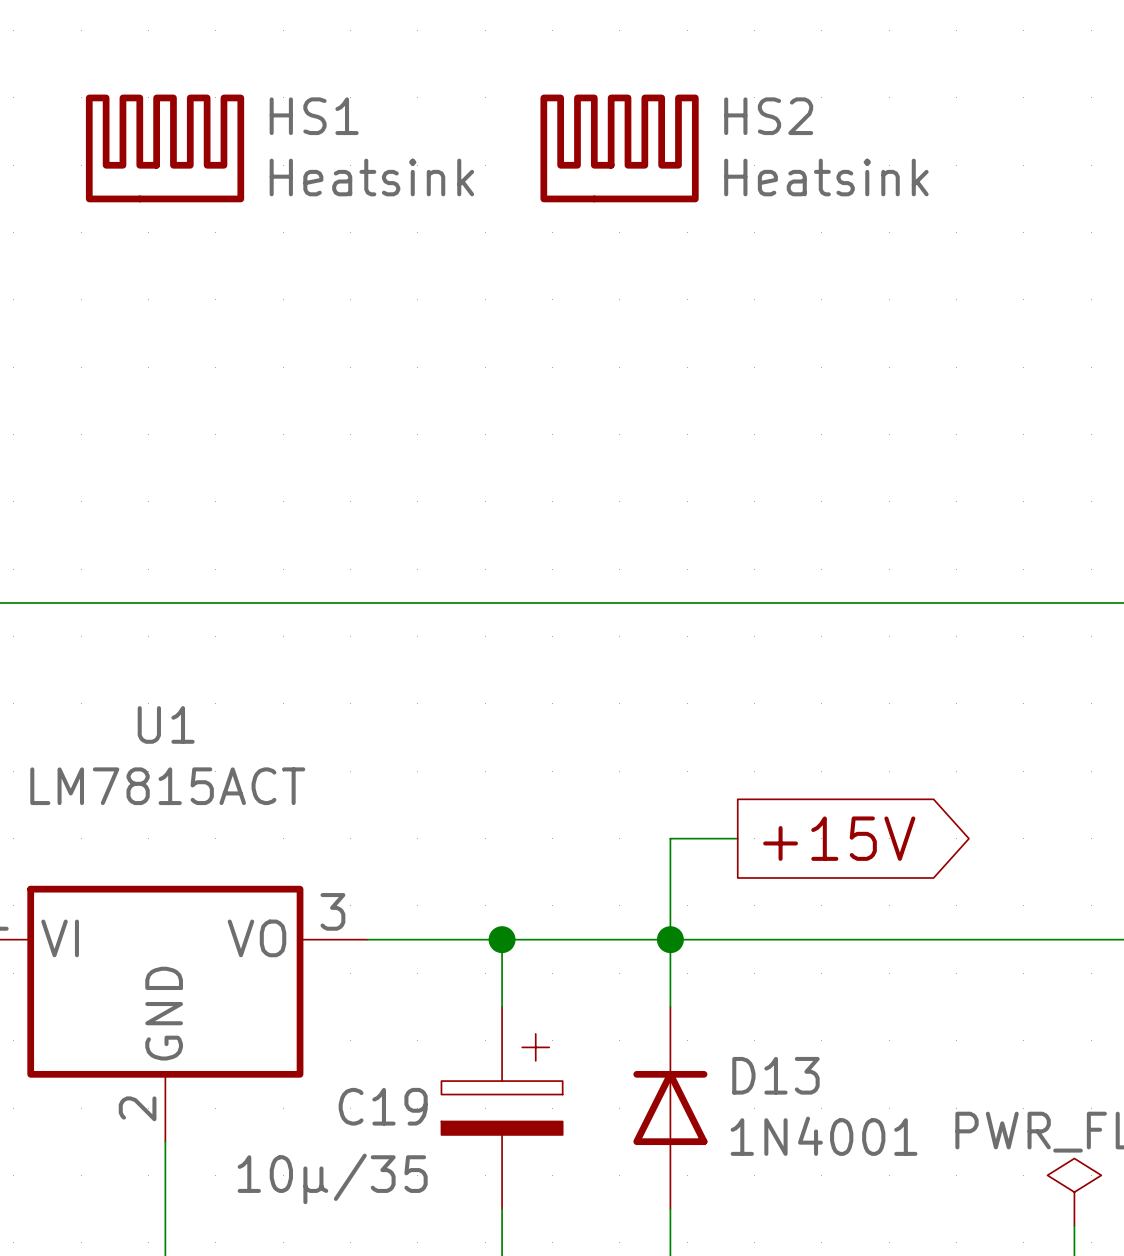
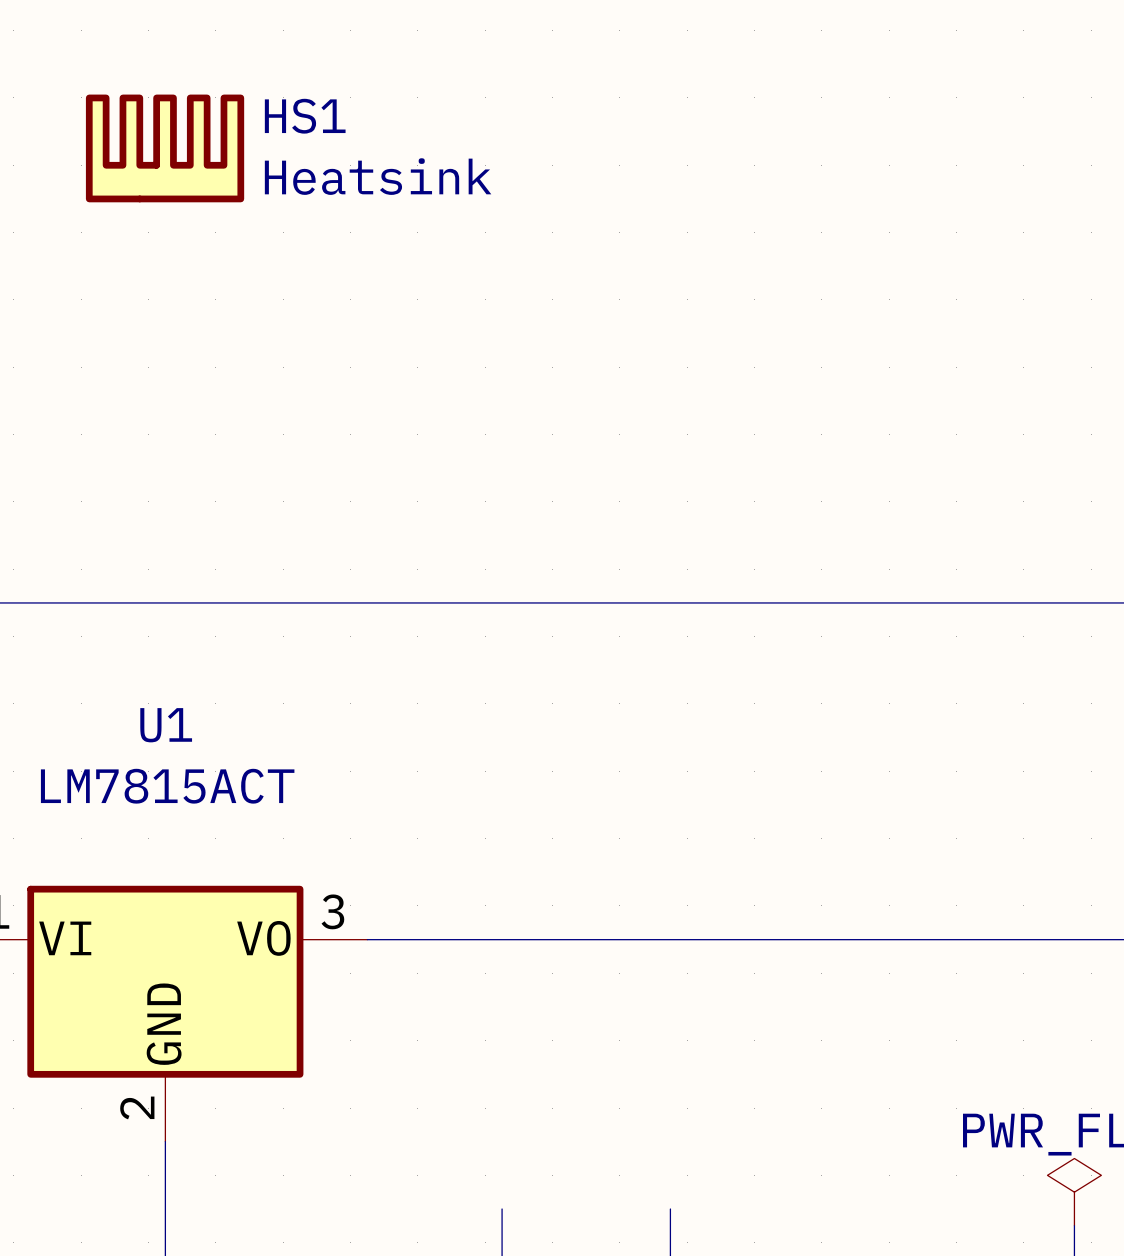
HS2: Heatsink (619, 148) -> none
wire: (737, 838) (670, 838) (670, 1007) -> none
global label: +15V (839, 838) -> none
wire: (502, 939) (502, 1007) -> none
junction: (502, 939) -> none
junction: (670, 939) -> none
C19: 10µ/35 (502, 1108) -> none
D13: 1N4001 (670, 1108) -> none

